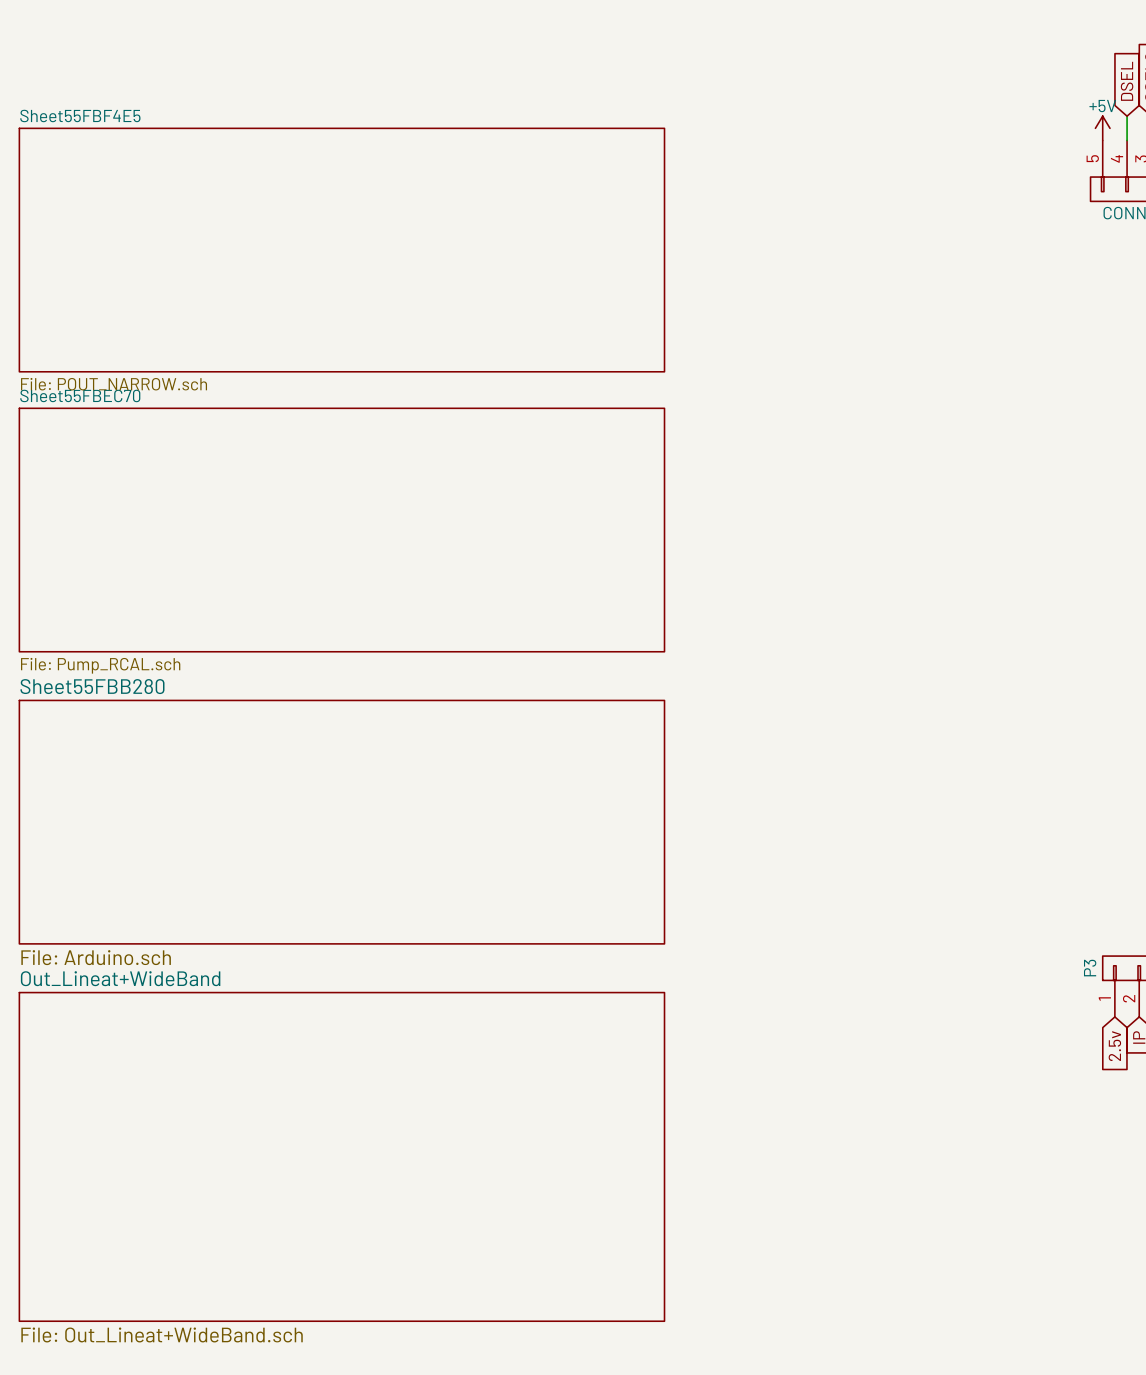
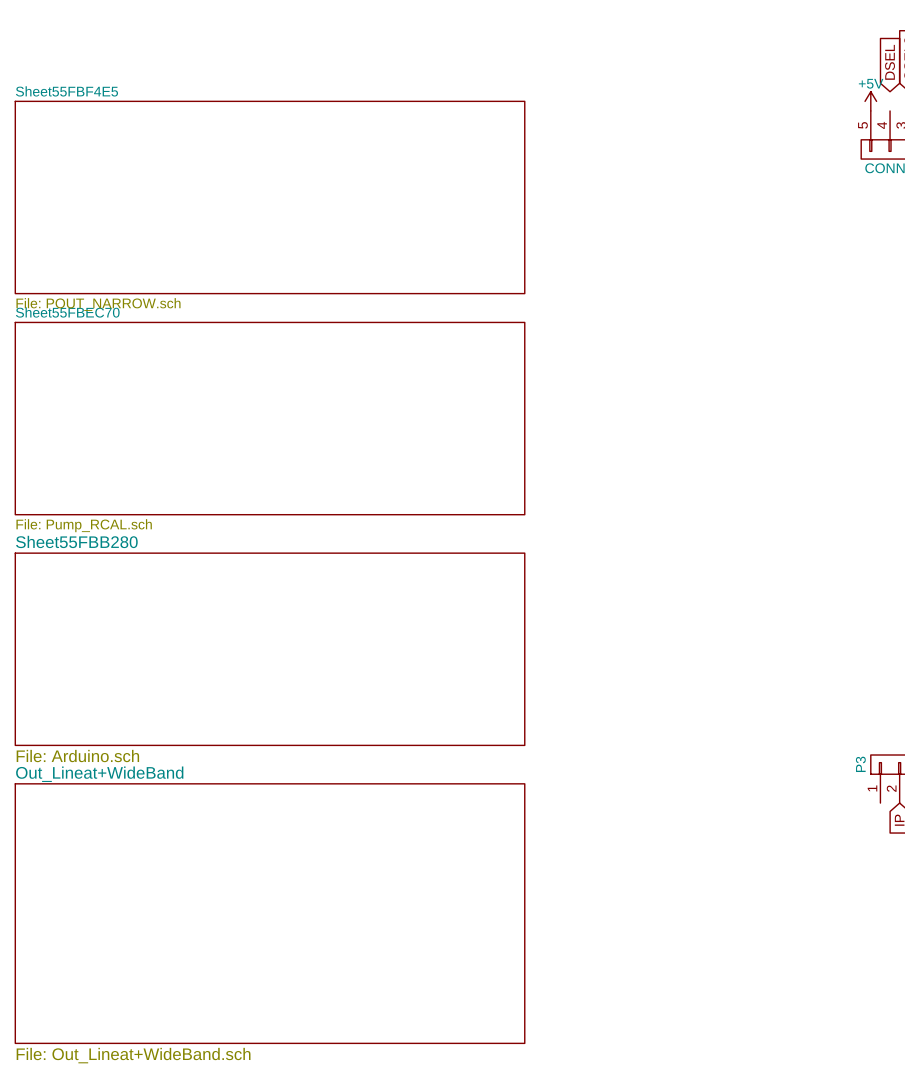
wire: (1127, 116) (1127, 140) -> none
global label: 2.5v (1114, 1046) -> none

